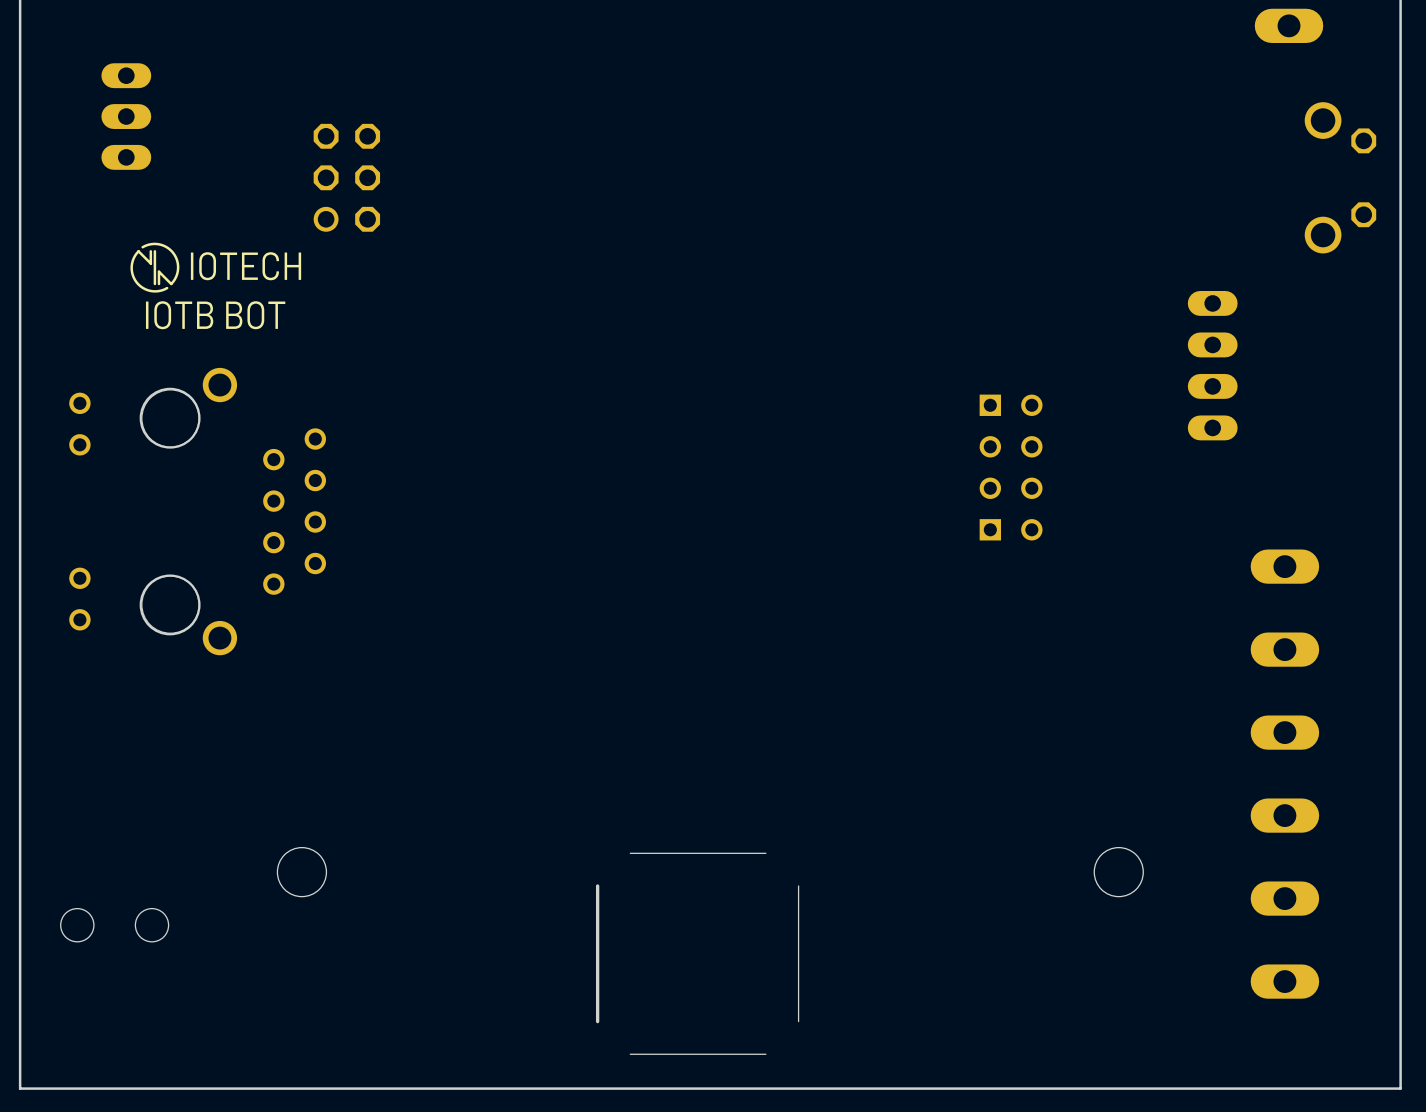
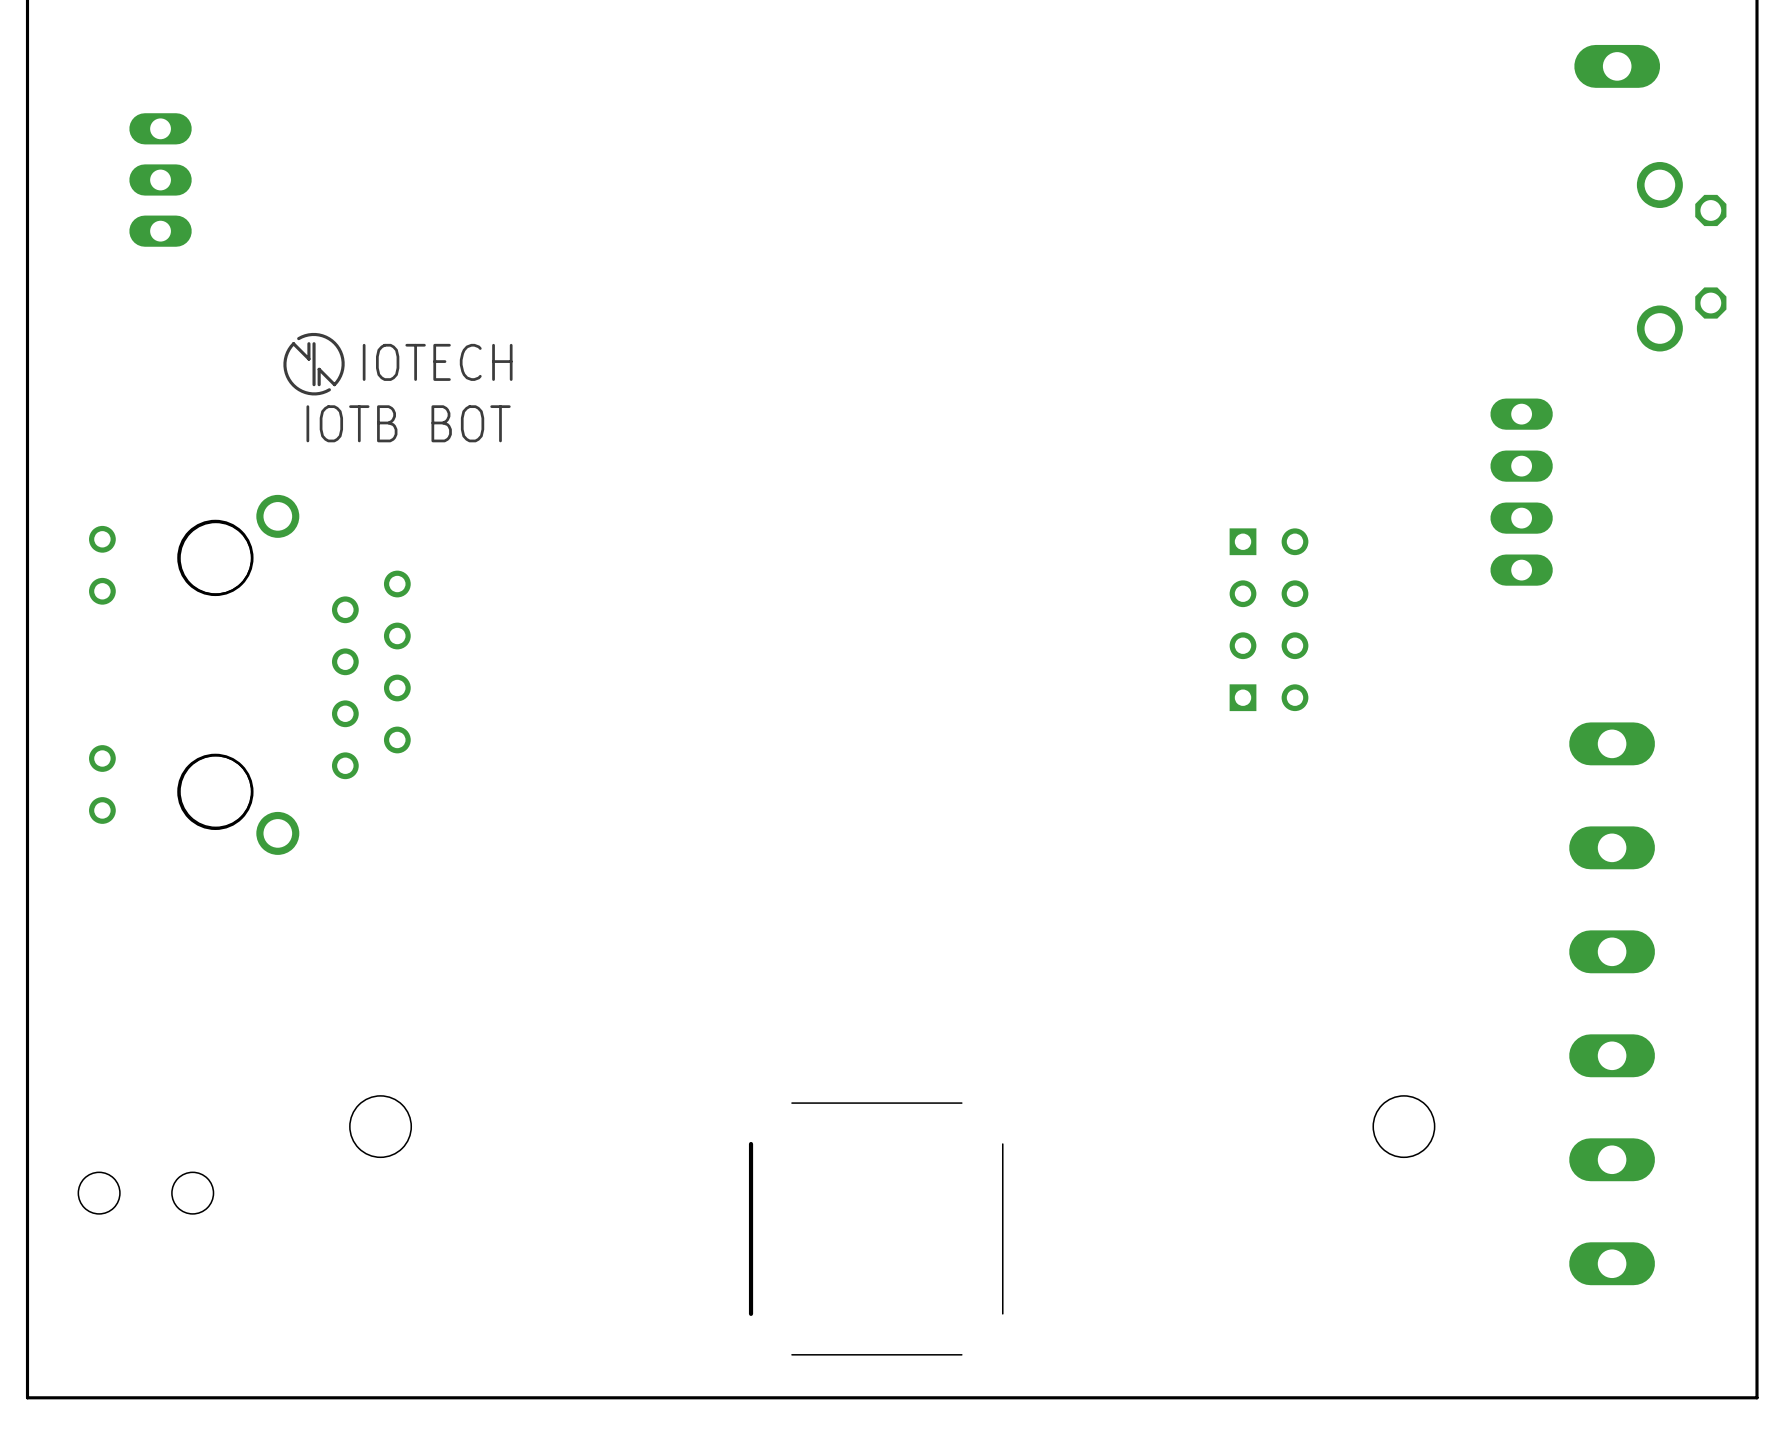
part: (346, 177) -> none
line: (142, 247) (150, 244) (161, 245) (169, 248) (176, 257) (178, 268) (174, 279) (171, 283) (158, 271) (158, 283) -> (298, 338) (308, 334) (322, 335) (331, 340) (340, 351) (343, 365) (338, 379) (334, 384) (319, 369) (319, 384)
line: (150, 251) (150, 263) (138, 251) (135, 255) (131, 266) (133, 277) (140, 286) (148, 290) (159, 291) (167, 288) -> (308, 343) (308, 359) (293, 343) (289, 349) (284, 362) (287, 376) (296, 387) (305, 392) (319, 393) (329, 389)
line: (154, 251) (154, 283) -> (314, 343) (314, 384)
text position: IOTECH (246, 266) -> IOTECH (437, 362)
text position: IOTB BOT (215, 315) -> IOTB BOT (408, 423)

